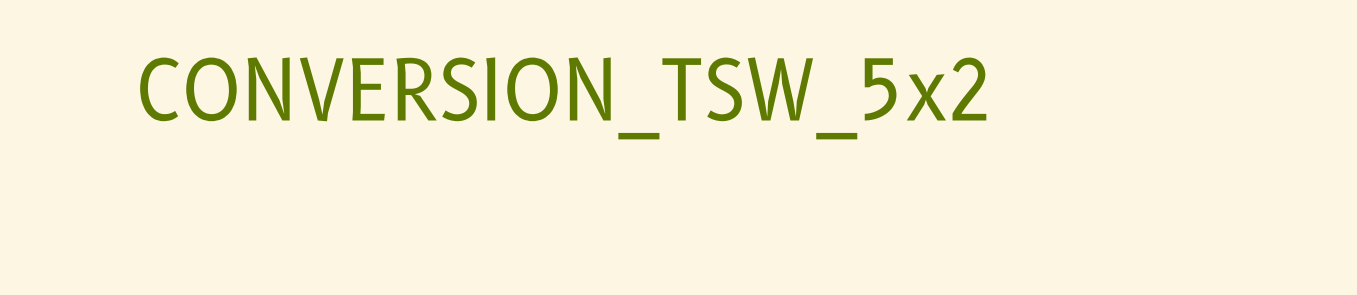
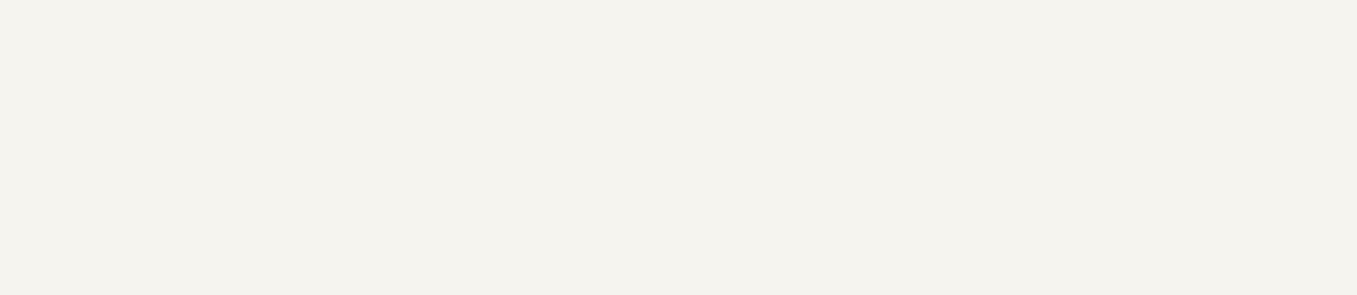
text: CONVERSION_TSW_5x2 (563, 98) -> none

